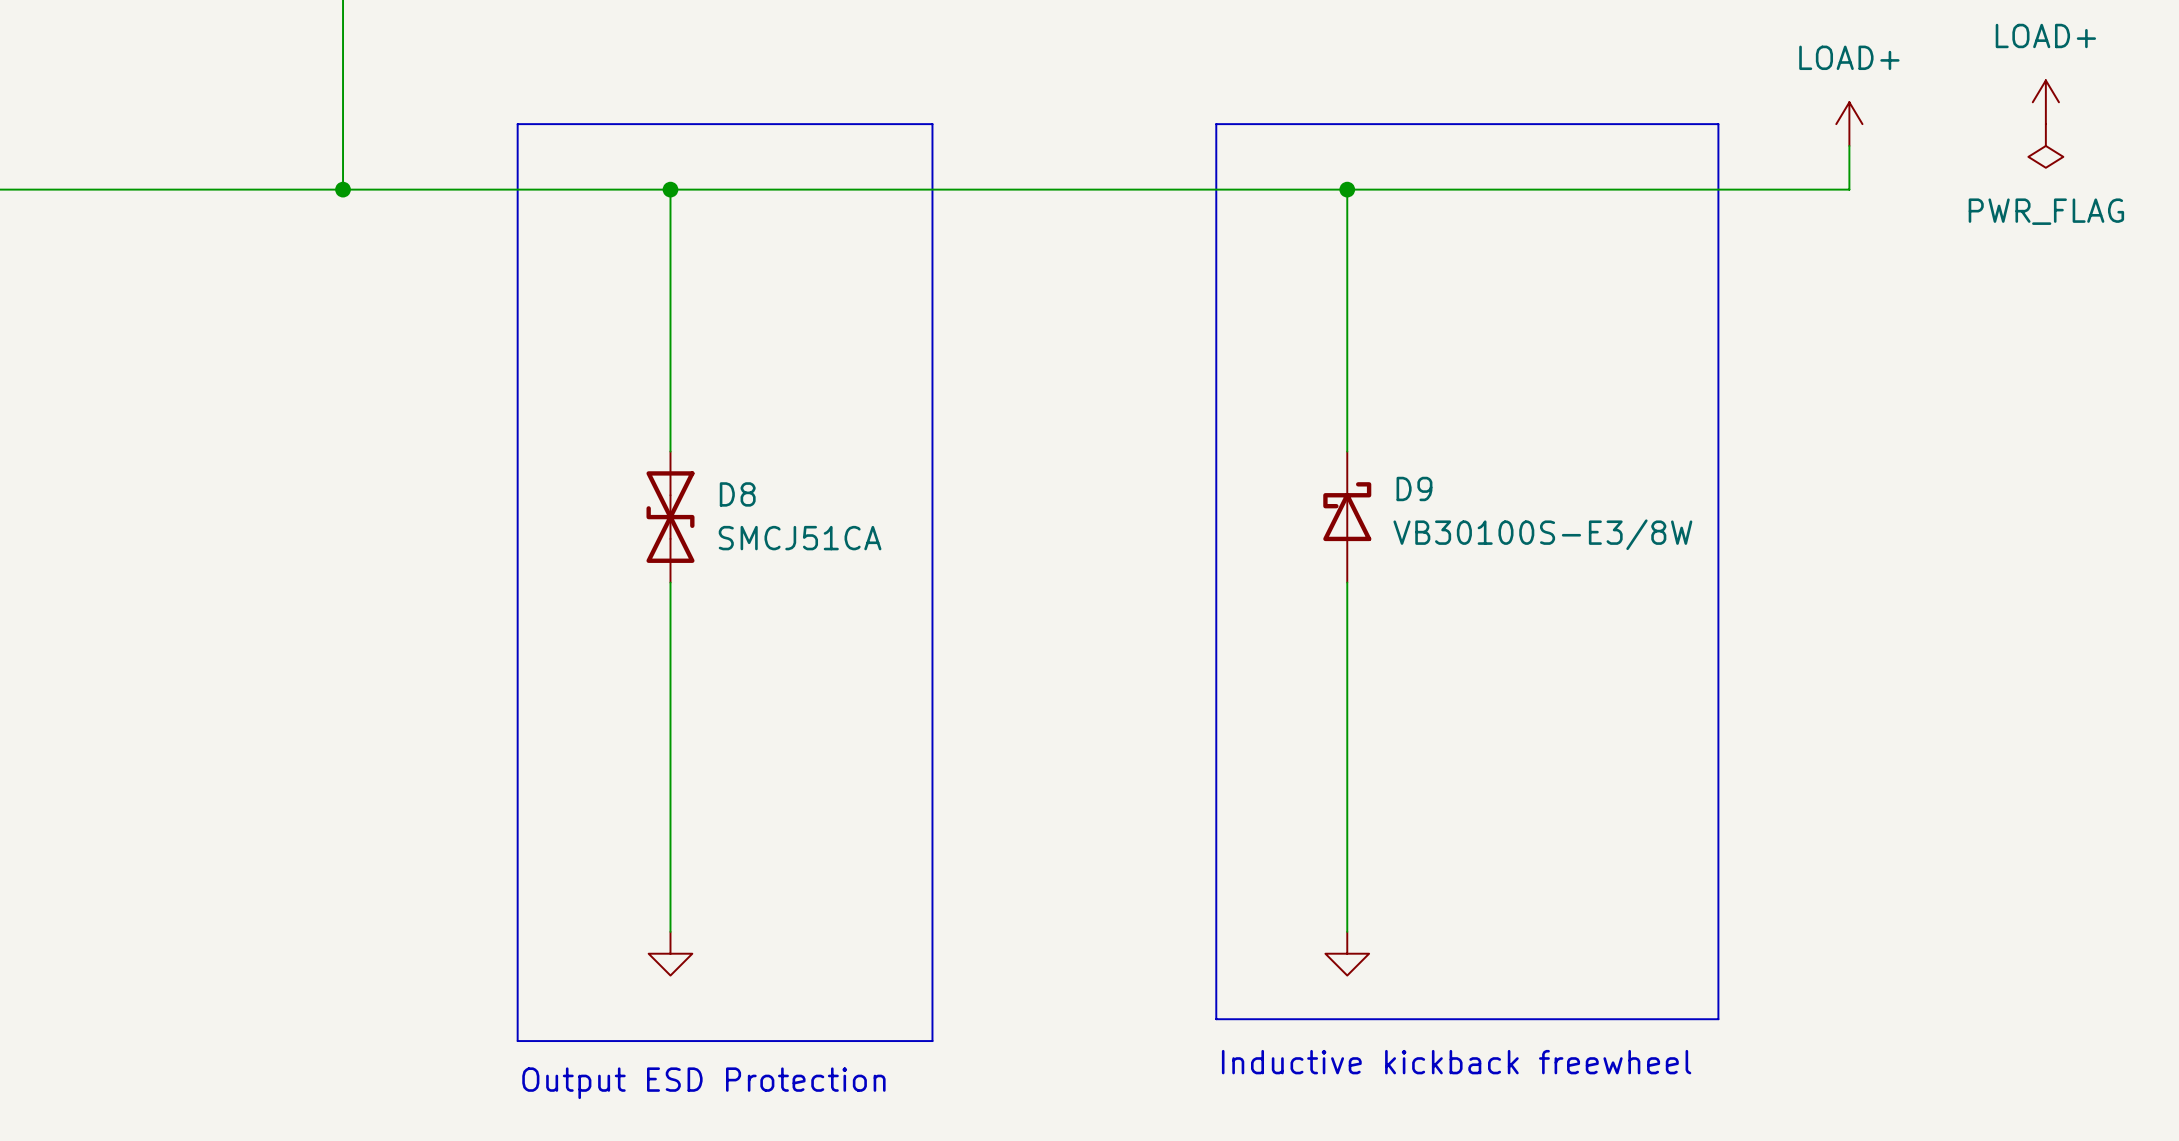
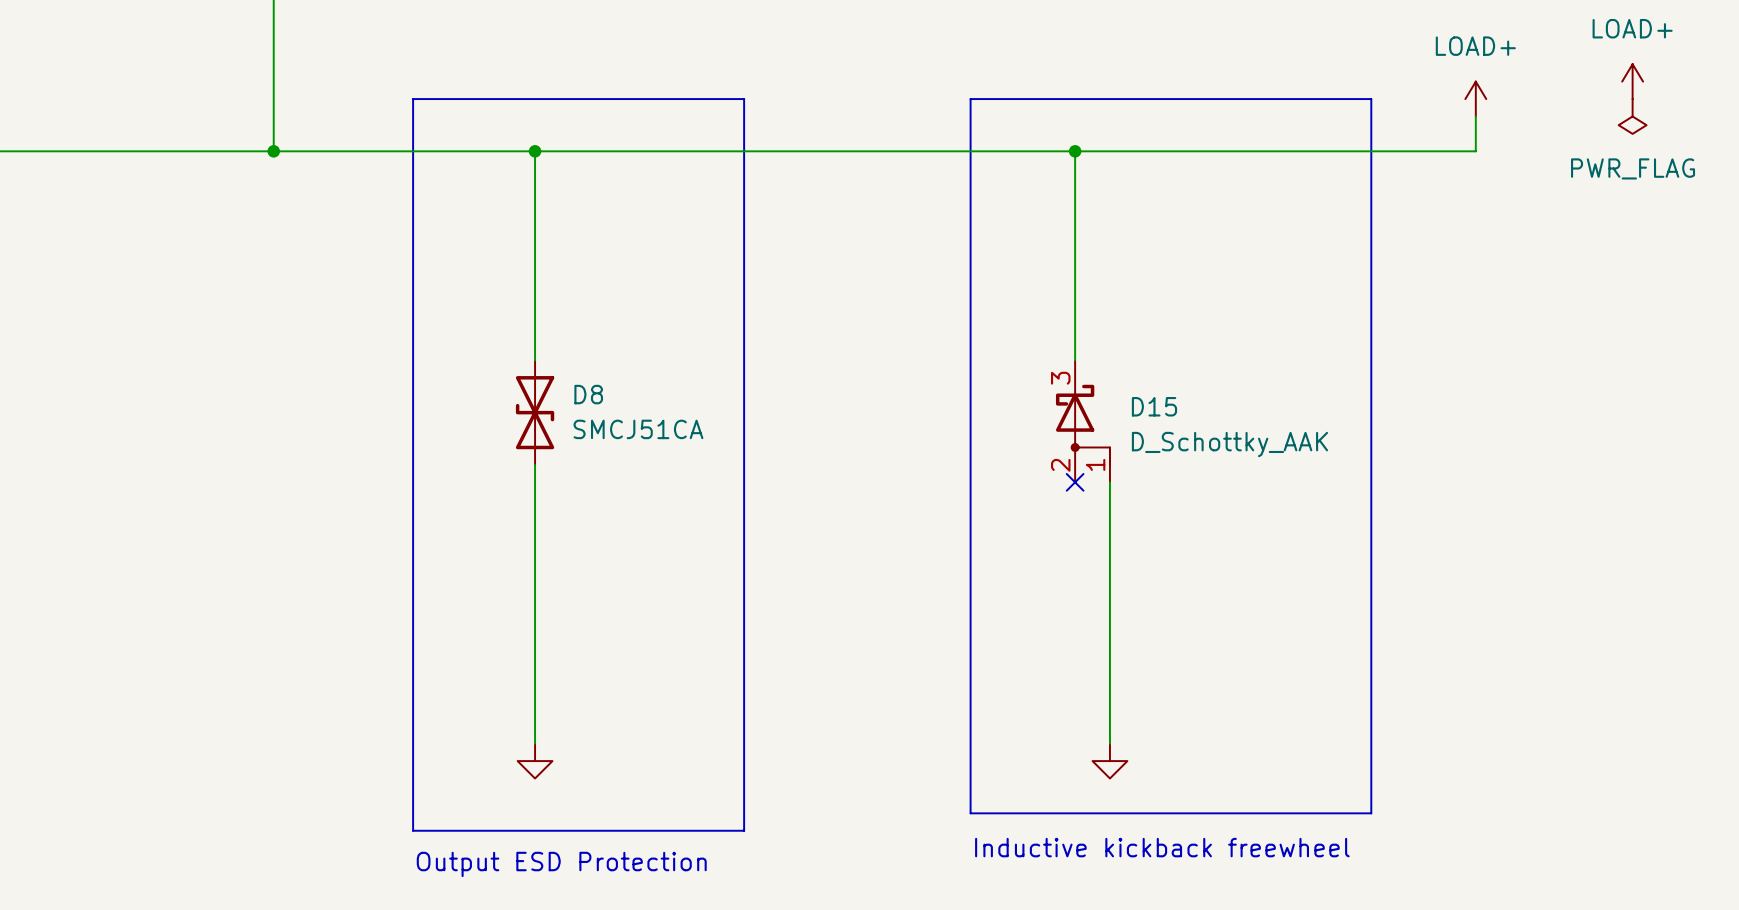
D9: VB30100S-E3/8W (1347, 517) -> none
D15: none -> D_Schottky_AAK (1082, 421)
wire: (1347, 582) (1347, 931) -> none
no-connect mark: none -> (1075, 482)
wire: none -> (1109, 482) (1109, 743)
power symbol position: (1347, 953) -> (1109, 761)

